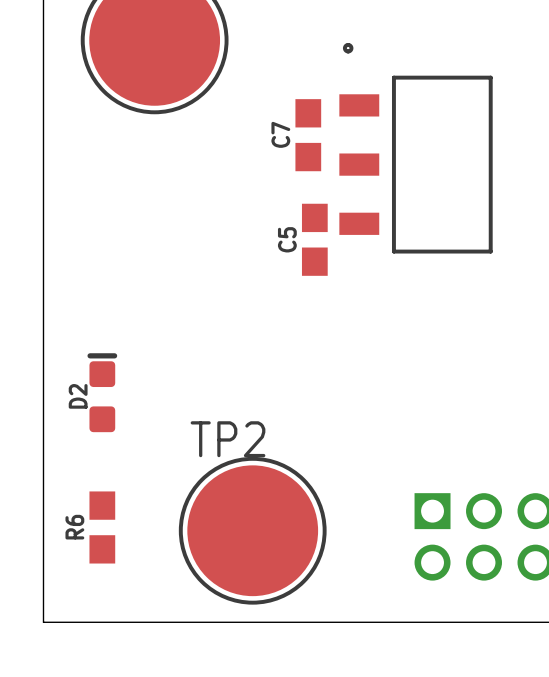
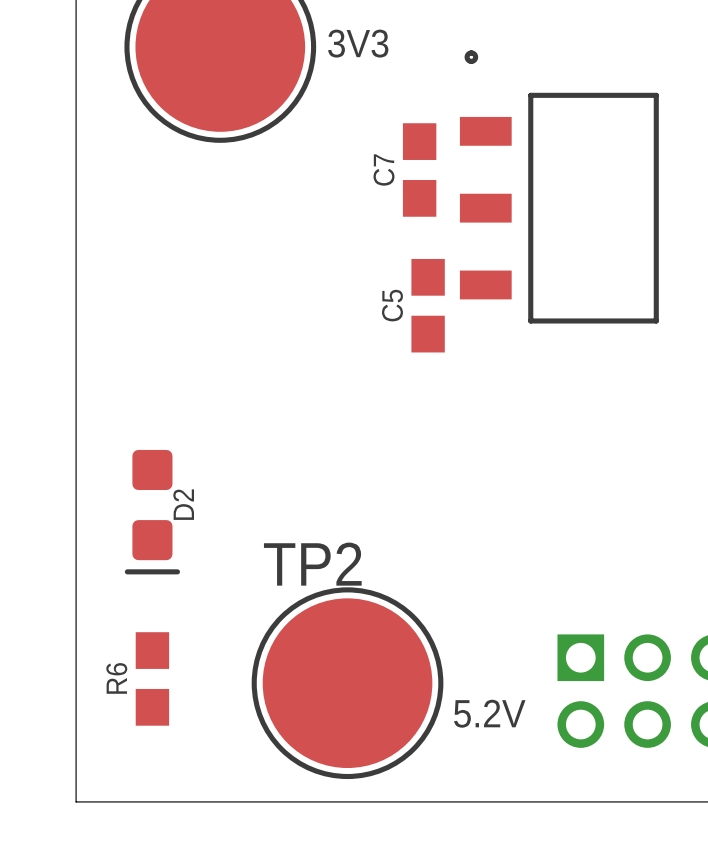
text: none -> 3V3 (358, 43)
D2 footprint: [87, 353, 118, 433] -> [124, 449, 181, 575]
text: none -> 5.2V (489, 713)

